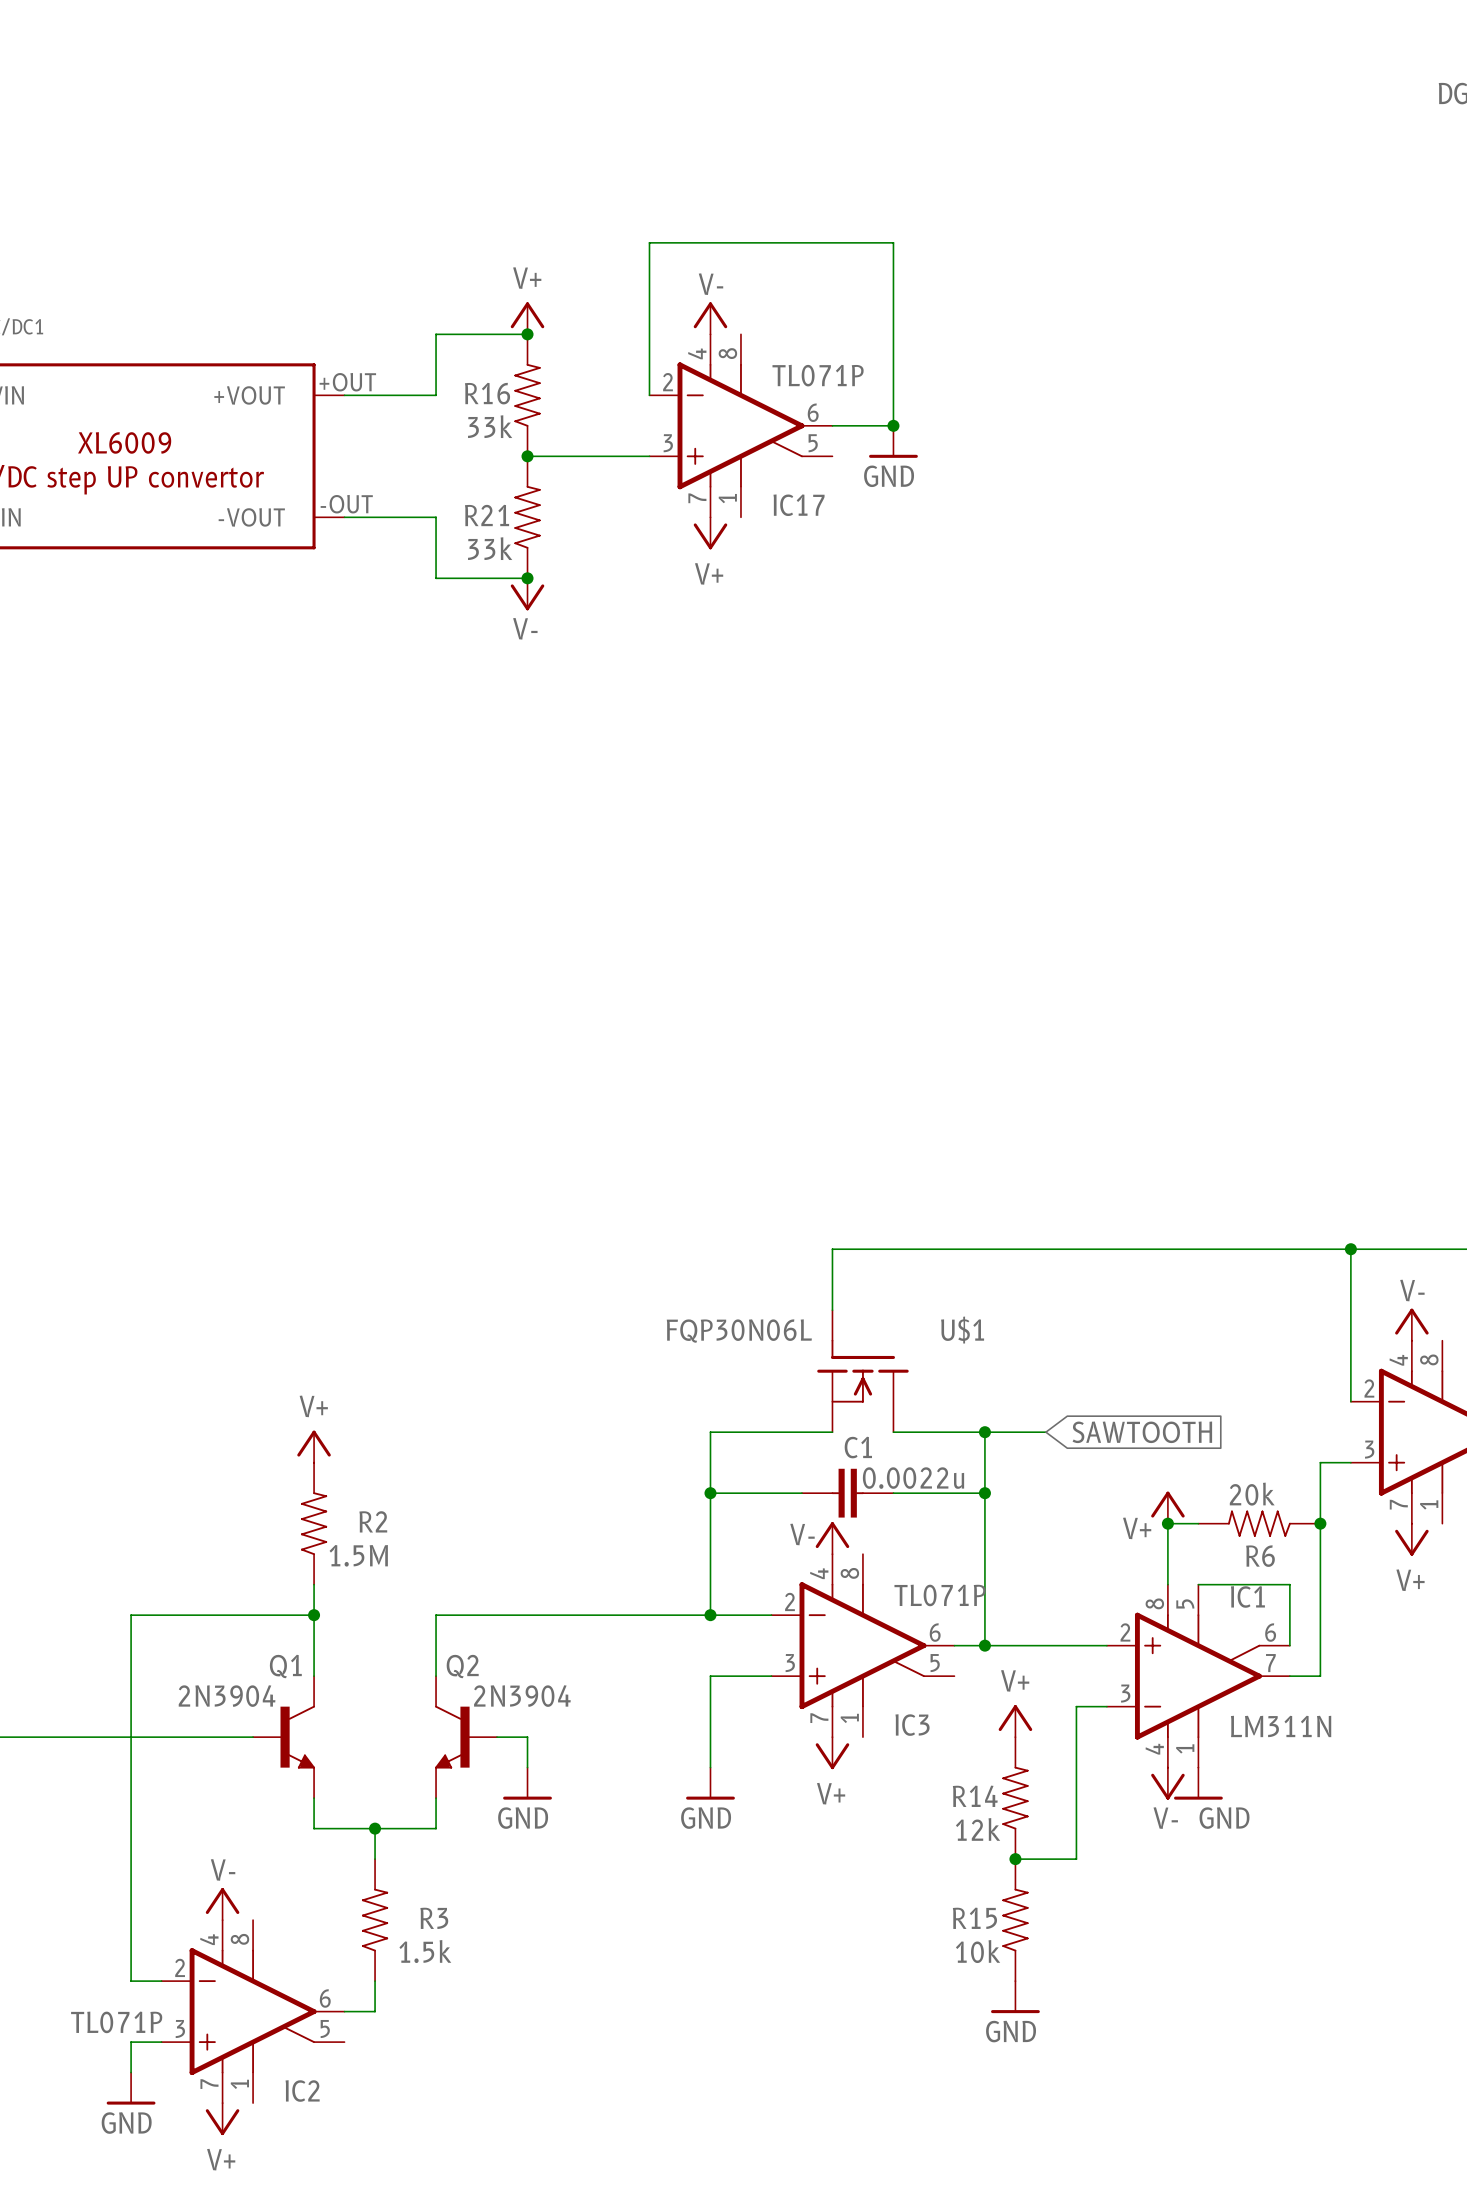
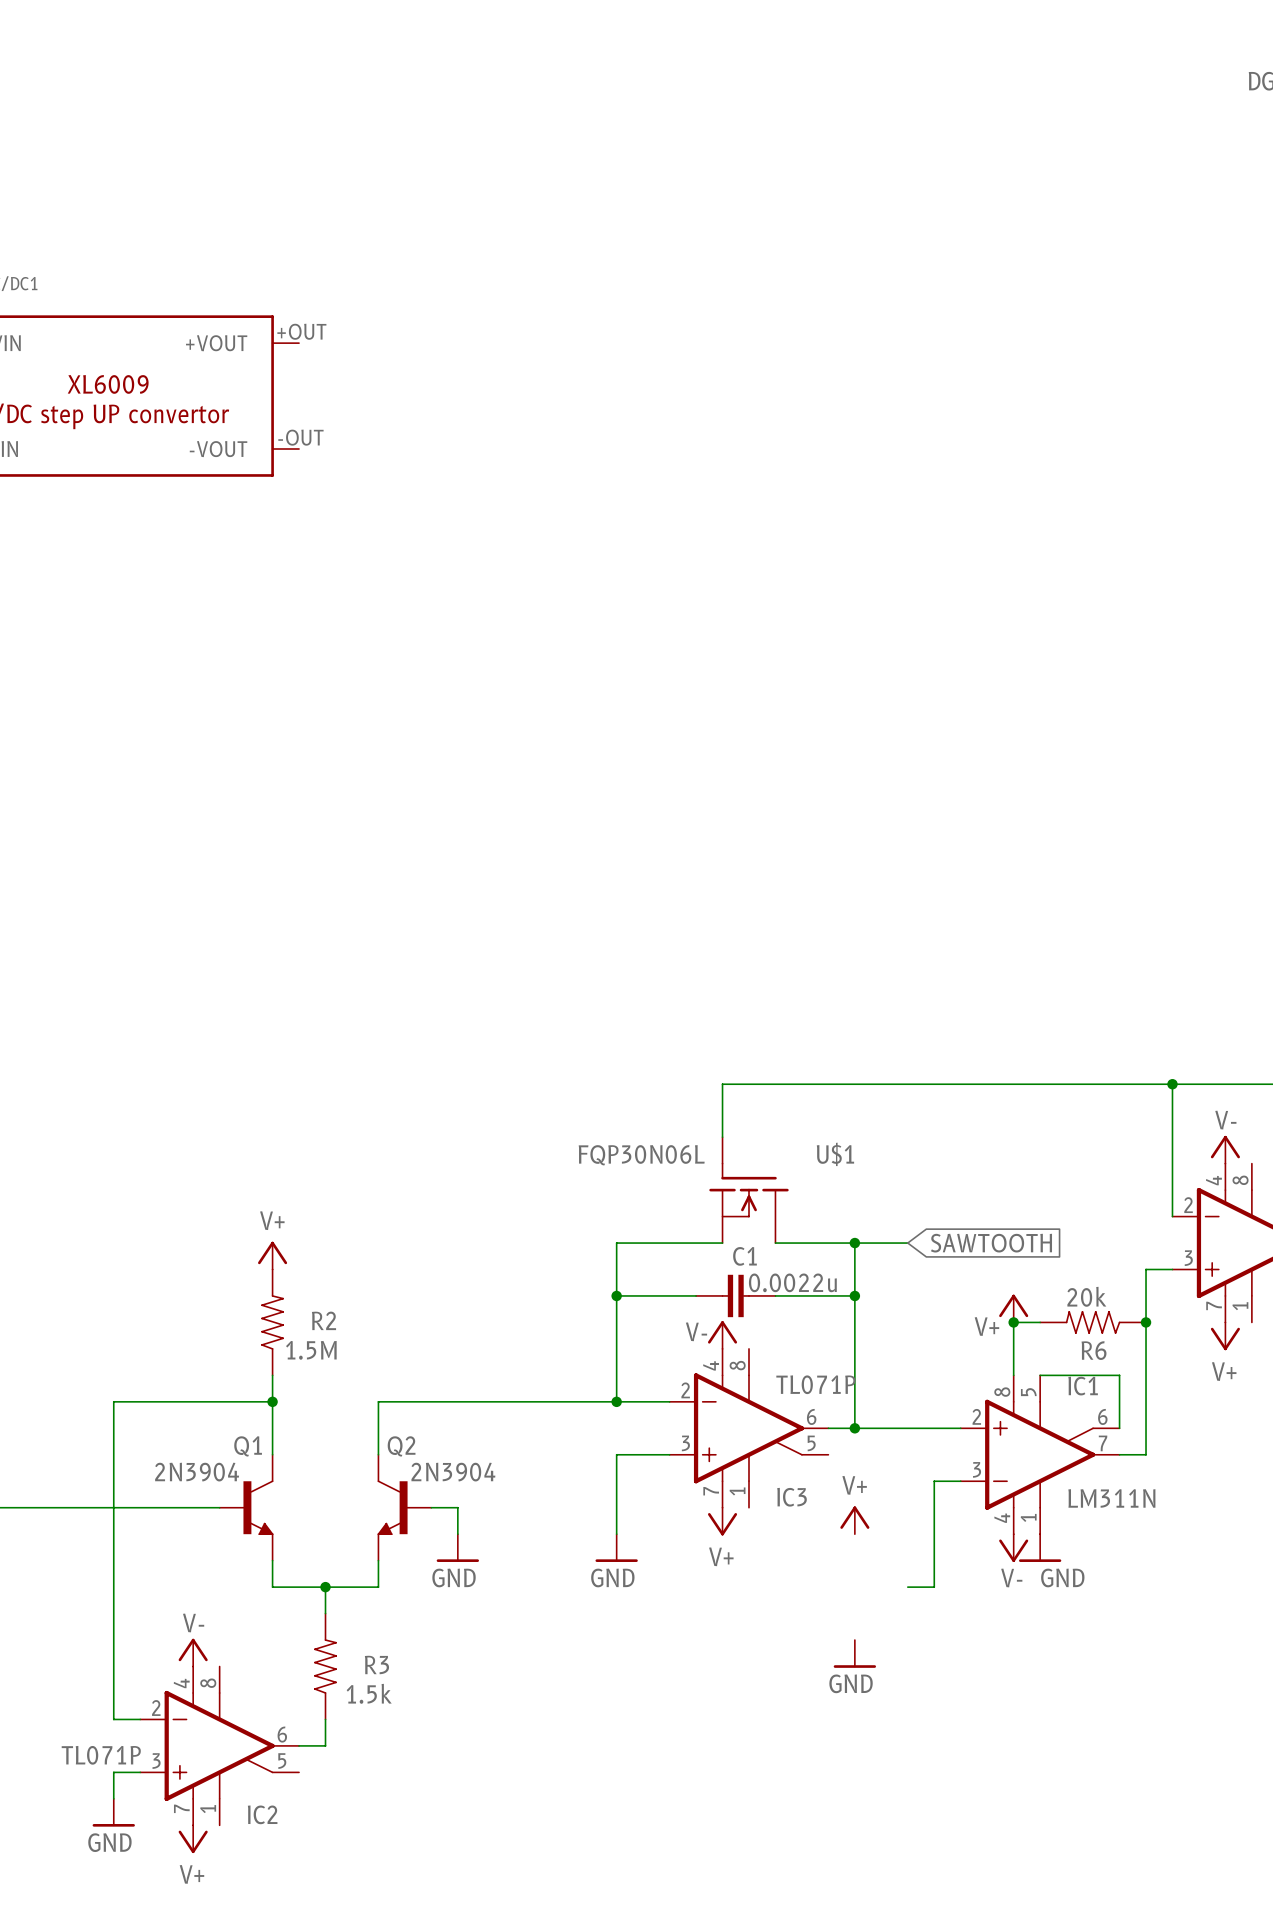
power symbol: V+ (527, 318) -> none
power symbol: V- (710, 318) -> none
wire: (527, 334) (436, 334) (436, 395) (344, 395) -> none
junction: (527, 334) -> none
R16: 33k (527, 395) -> none
wire: (649, 395) (649, 242) (893, 242) (893, 425) (832, 425) -> none
IC17: TL071P (740, 425) -> none
junction: (893, 425) -> none
power symbol: GND (893, 441) -> none
wire: (527, 456) (649, 456) -> none
junction: (527, 456) -> none
wire: (344, 517) (436, 517) (436, 578) (527, 578) -> none
R21: 33k (527, 517) -> none
power symbol: V+ (710, 533) -> none
junction: (527, 578) -> none
power symbol: V- (527, 594) -> none
power symbol position: V+ (1015, 1721) -> V+ (854, 1520)
R14: 12k (1015, 1798) -> none
wire: (1076, 1828) (1076, 1859) (1015, 1859) -> (934, 1587) (907, 1587)
junction: (1015, 1859) -> none
R15: 10k (1015, 1920) -> none
power symbol position: GND (1015, 1997) -> GND (854, 1653)

